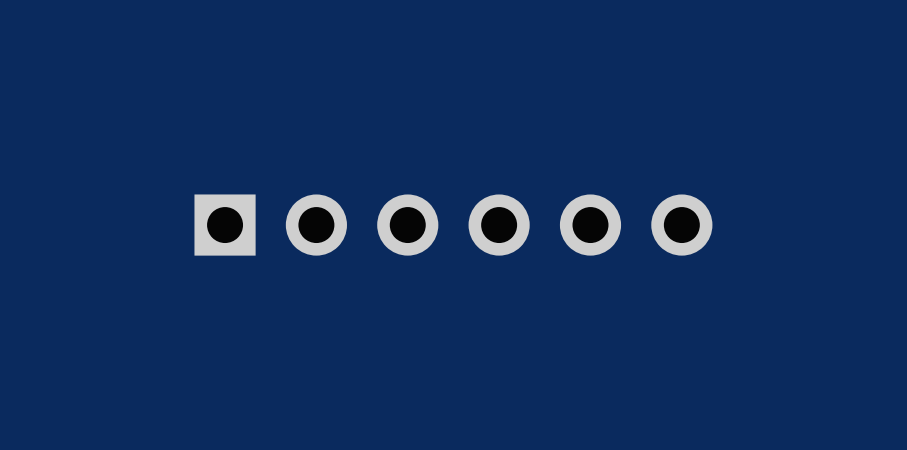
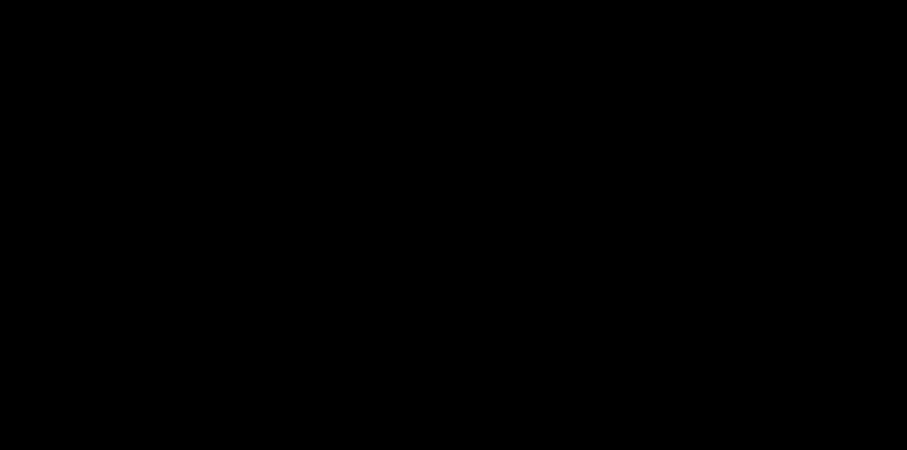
part: (453, 225) -> none

